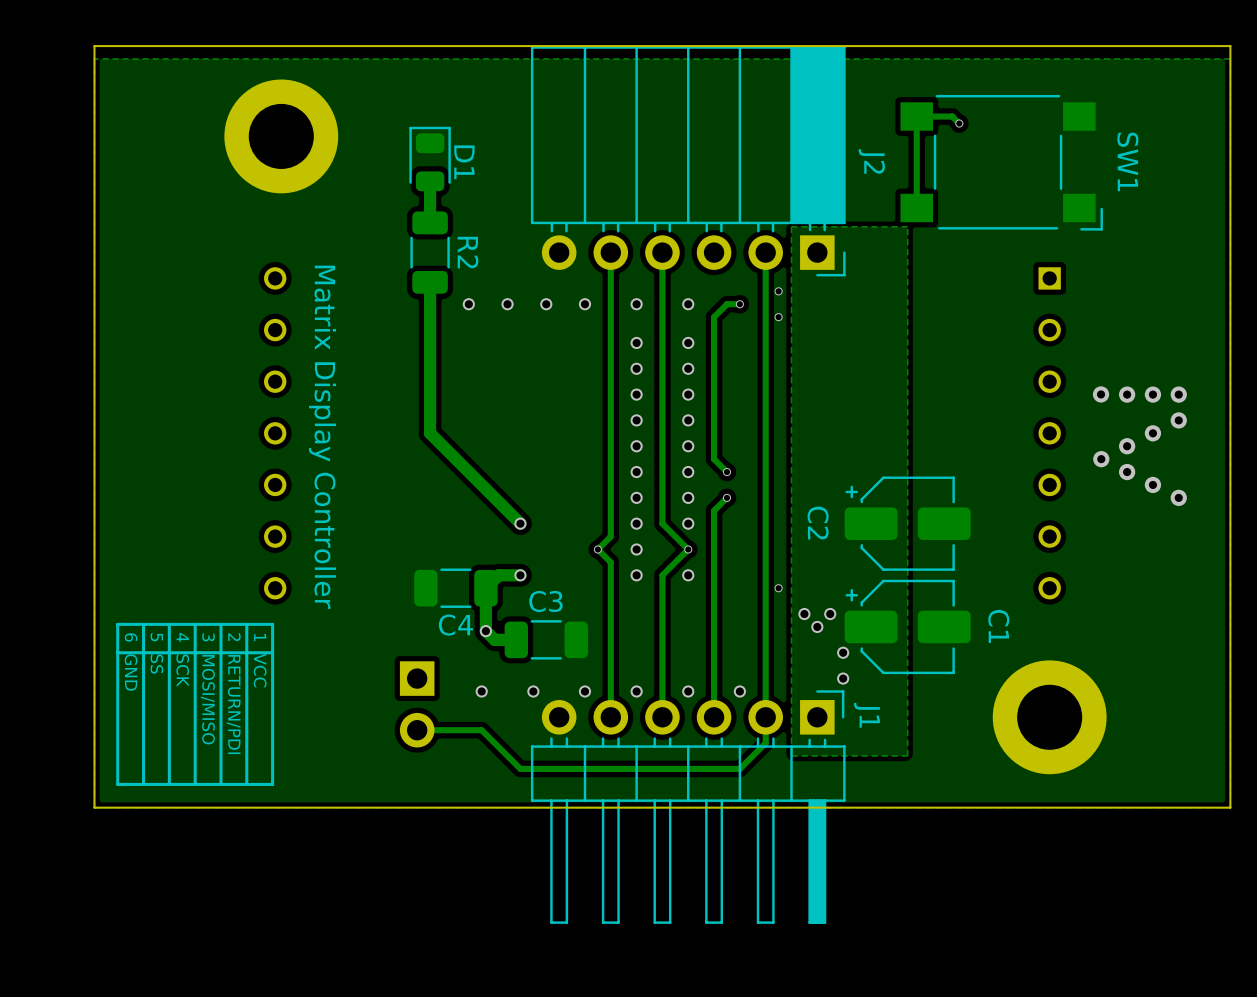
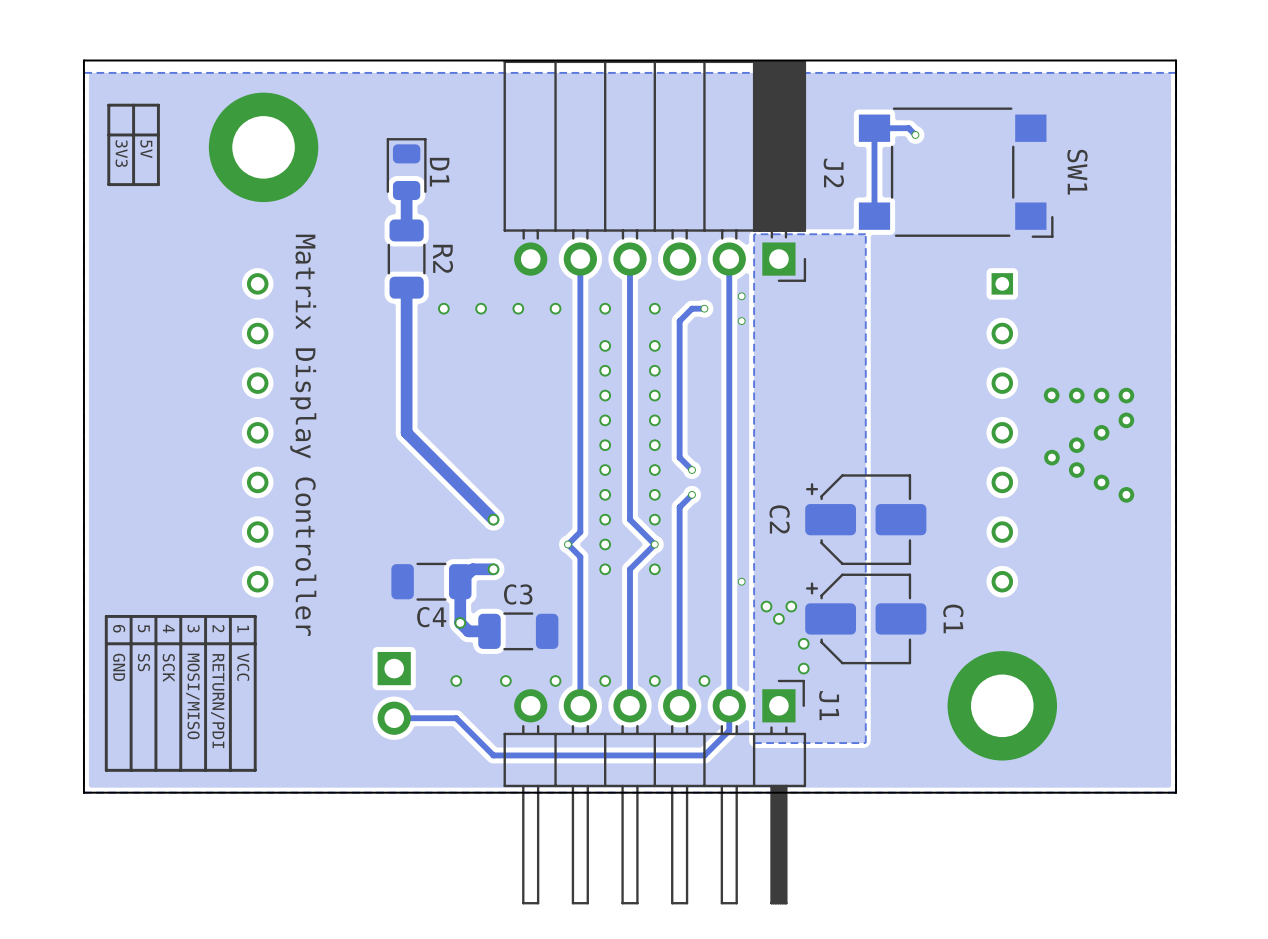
line: none -> (133, 105) (133, 184)
line: none -> (158, 105) (108, 105) (108, 184) (158, 184) (158, 105)
line: none -> (158, 134) (108, 134)
text: none -> 5V (146, 149)
text: none -> 3V3 (121, 153)

